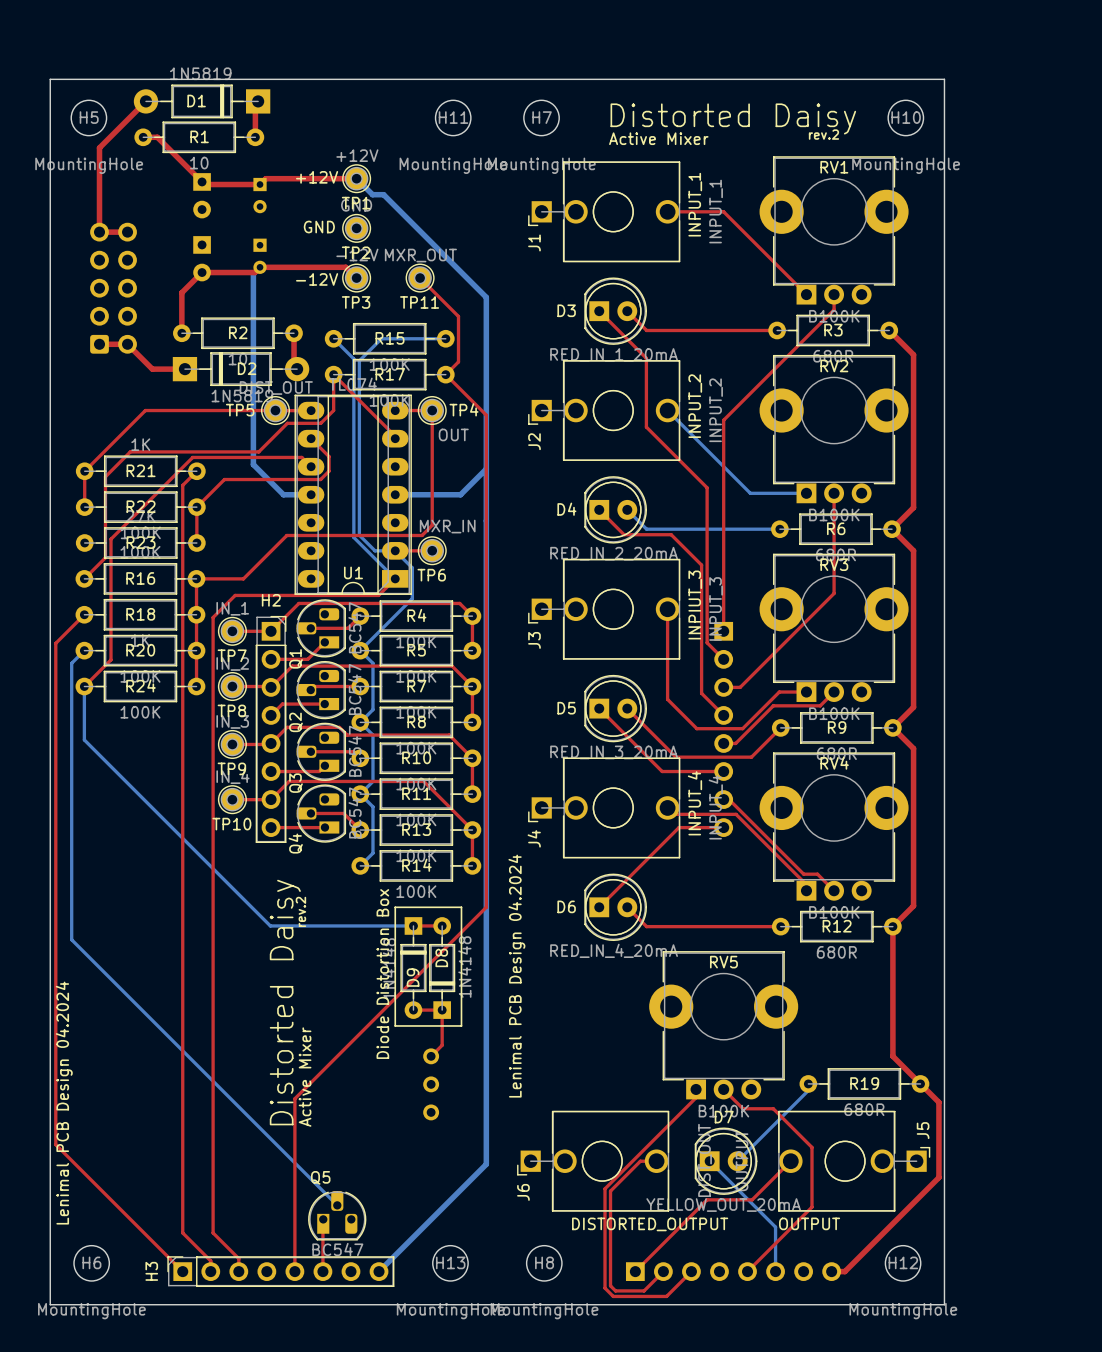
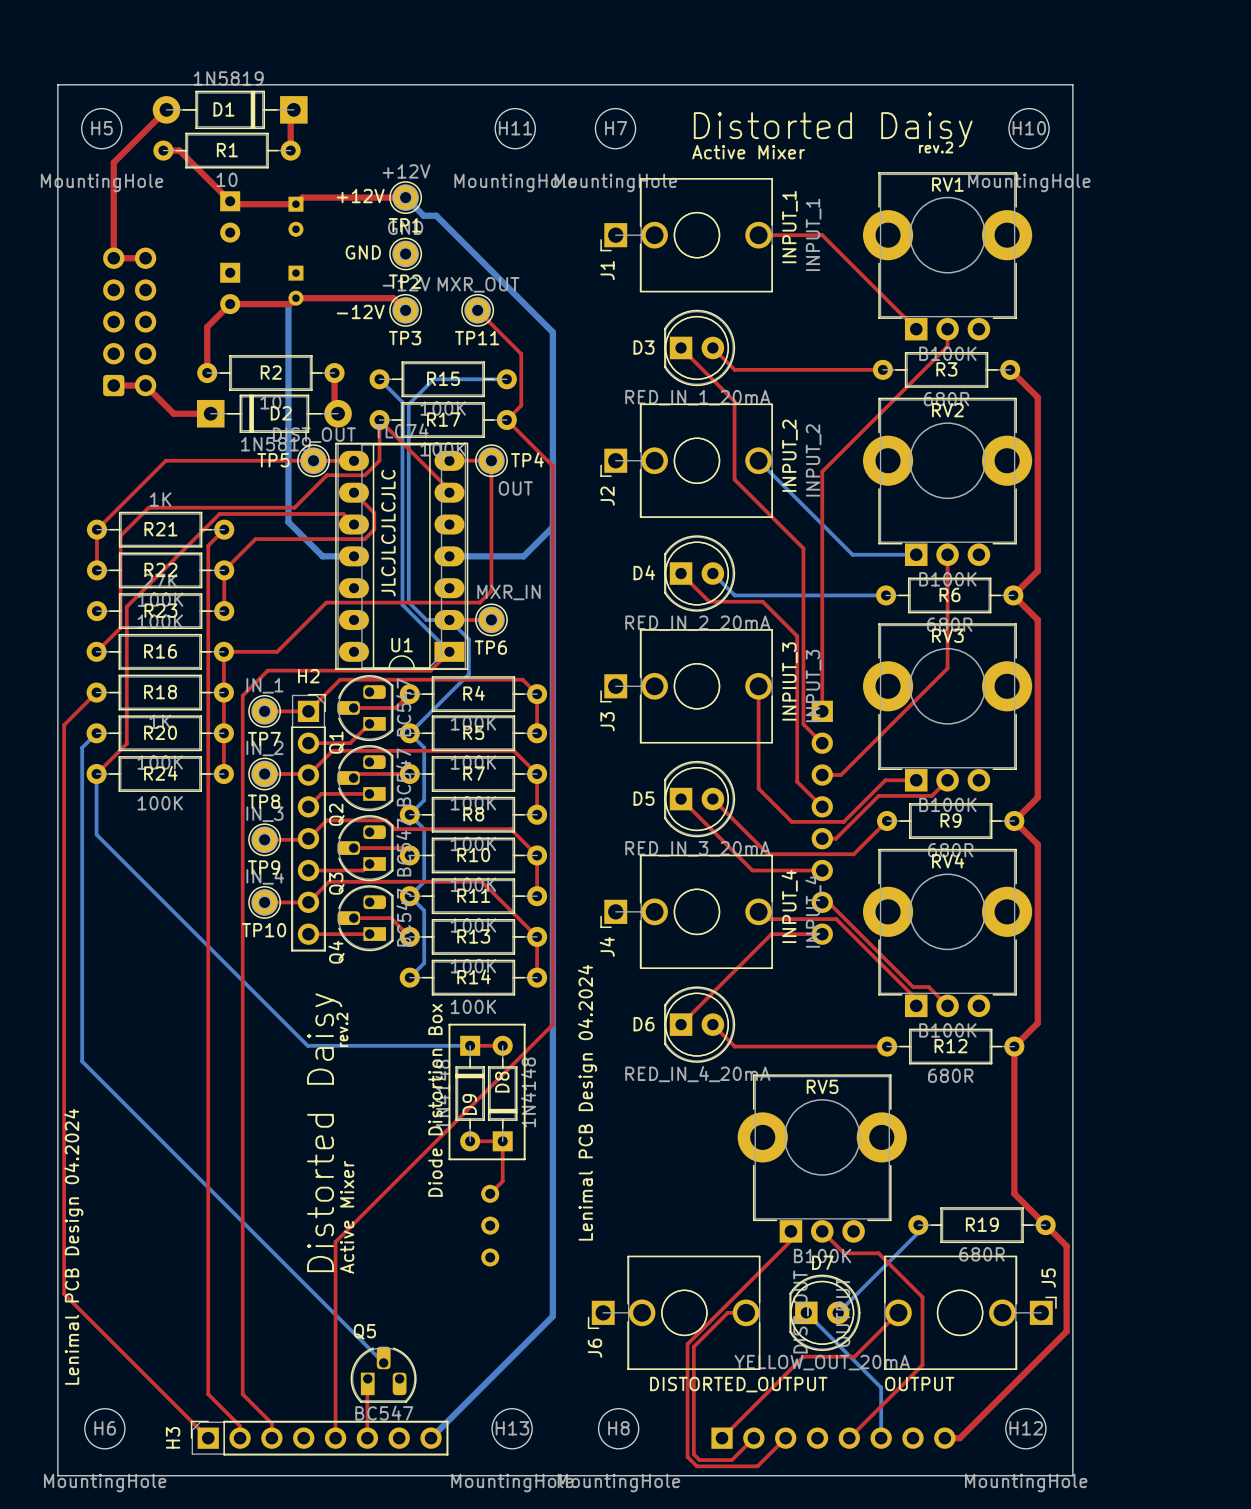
text: none -> JLCJLCJLCJLC (388, 533)

